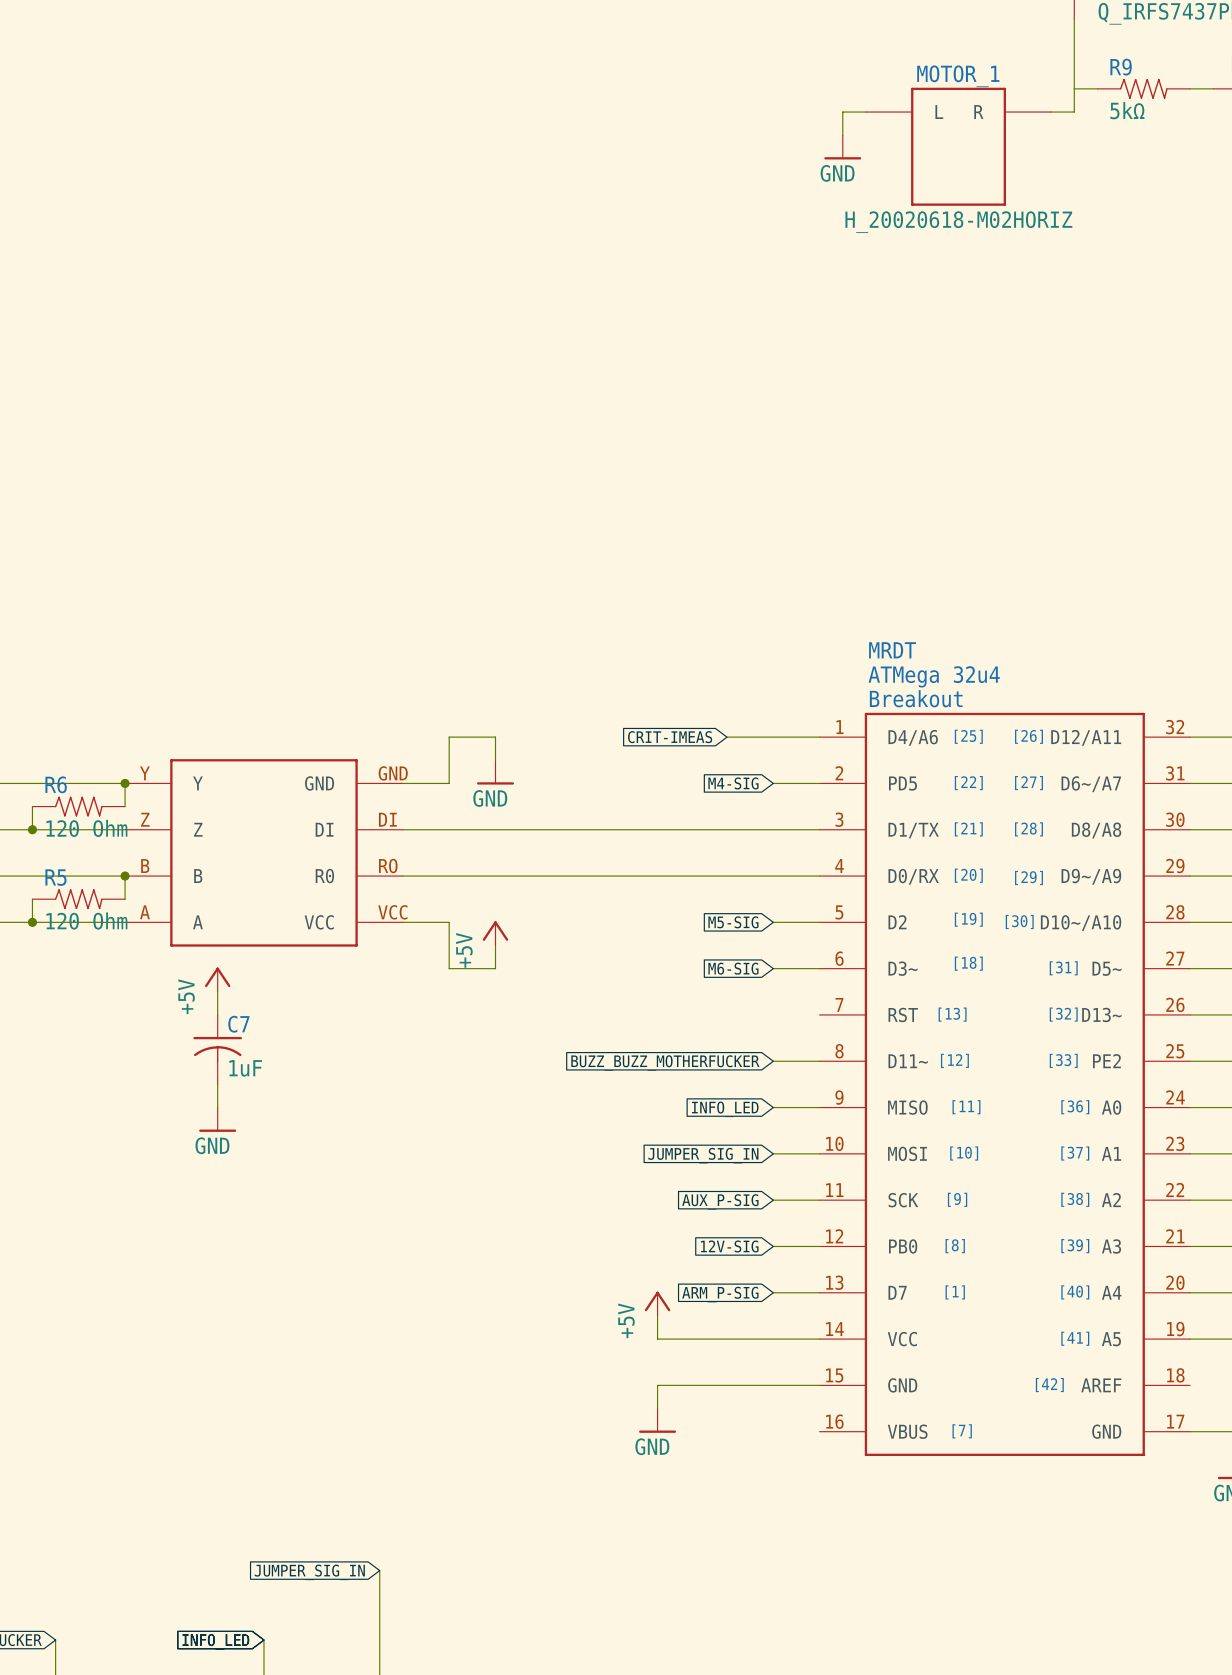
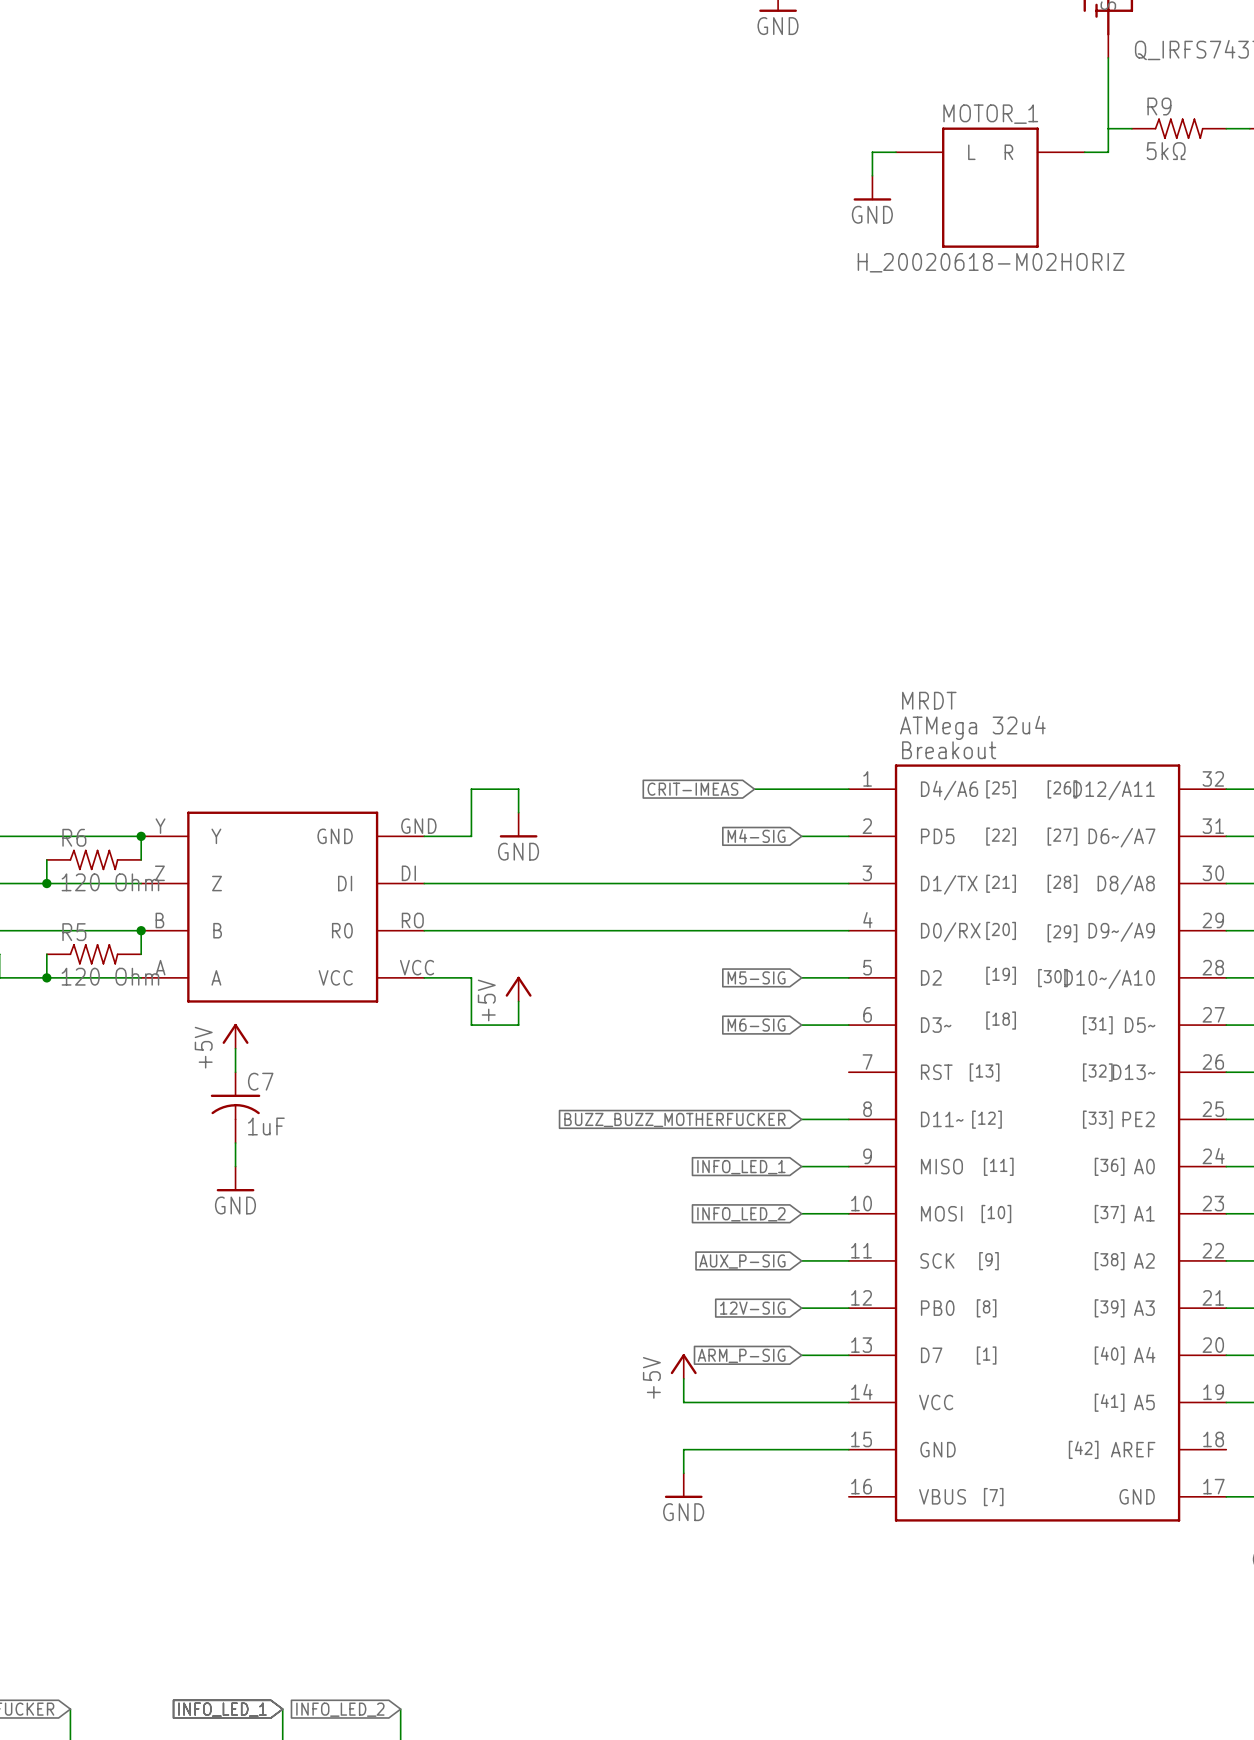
global label: INFO_LED (725, 1109) -> INFO_LED_1 (741, 1167)
global label: JUMPER_SIG_IN (703, 1155) -> INFO_LED_2 (741, 1214)
wire: (379, 1570) (379, 1640) -> none
global label: JUMPER_SIG_IN (309, 1572) -> none
global label: INFO_LED (215, 1641) -> INFO_LED_1 (222, 1709)
global label: none -> INFO_LED_2 (340, 1709)

